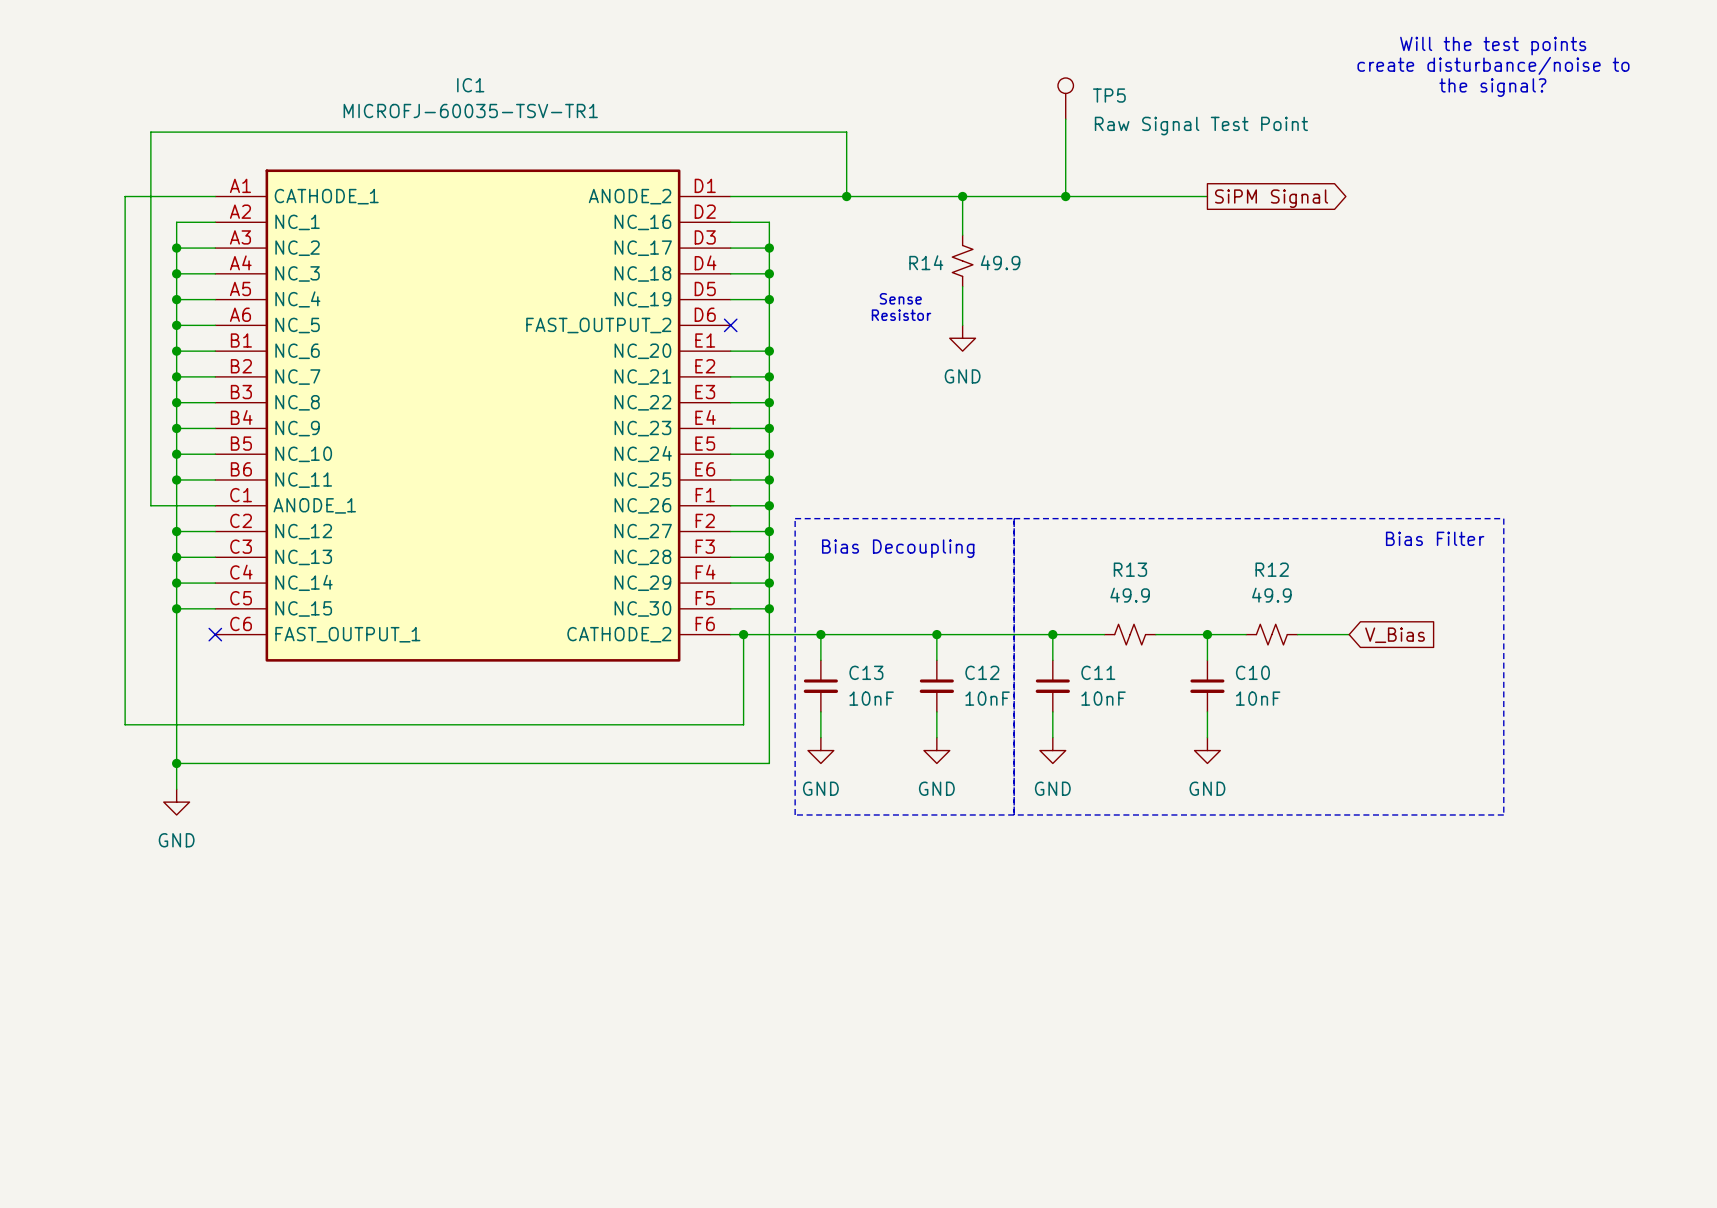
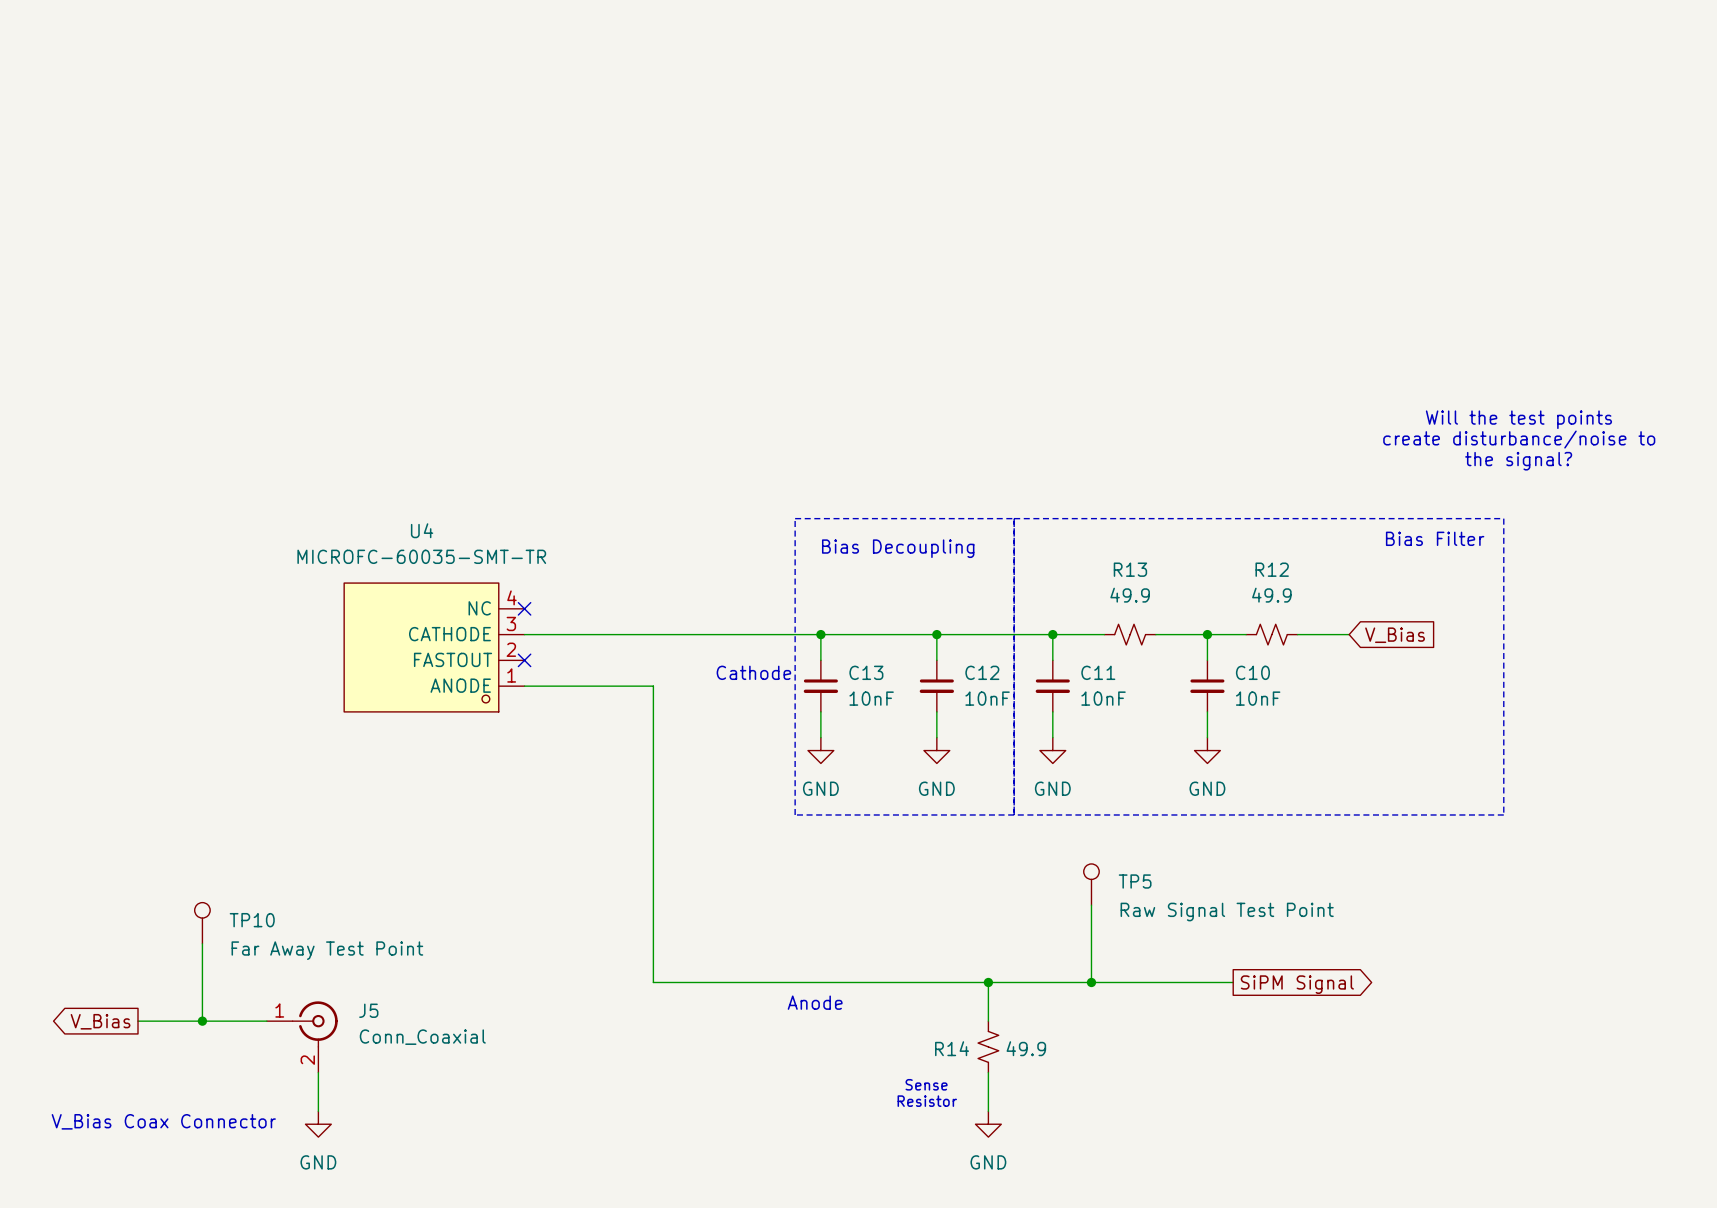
text: Will the test points (1493, 46) -> none
text: create disturbance/noise to (1493, 65) -> none
text: the signal? (1492, 87) -> none
TP5 position: (1065, 98) -> (1091, 884)
wire: (1065, 119) (1065, 196) -> none
wire: (215, 196) (125, 196) (125, 724) (743, 724) (743, 634) -> none
wire: (730, 196) (1207, 196) -> none
wire: (846, 196) (846, 132) (150, 132) (150, 505) (215, 505) -> none
junction: (846, 196) -> none
wire: (962, 196) (962, 235) -> none
junction: (962, 196) -> none
junction: (1065, 196) -> none
global label: SiPM Signal (1271, 198) -> none
wire: (215, 222) (176, 222) (176, 789) -> none
wire: (730, 222) (769, 222) (769, 763) (176, 763) -> none
wire: (176, 248) (215, 248) -> none
junction: (176, 248) -> none
wire: (730, 248) (769, 248) -> none
junction: (769, 248) -> none
R14 position: (962, 260) -> (988, 1046)
wire: (176, 273) (215, 273) -> none
junction: (176, 273) -> none
wire: (730, 273) (769, 273) -> none
junction: (769, 273) -> none
wire: (962, 286) (962, 325) -> none
text: Sense (900, 298) -> none
wire: (176, 299) (215, 299) -> none
junction: (176, 299) -> none
wire: (730, 299) (769, 299) -> none
junction: (769, 299) -> none
text: Resistor (901, 315) -> none
wire: (176, 325) (215, 325) -> none
junction: (176, 325) -> none
no-connect mark: (730, 325) -> none
power symbol: GND (962, 338) -> none
wire: (176, 351) (215, 351) -> none
junction: (176, 351) -> none
wire: (730, 351) (769, 351) -> none
junction: (769, 351) -> none
wire: (176, 376) (215, 376) -> none
junction: (176, 376) -> none
wire: (730, 376) (769, 376) -> none
junction: (769, 376) -> none
wire: (176, 402) (215, 402) -> none
junction: (176, 402) -> none
wire: (730, 402) (769, 402) -> none
junction: (769, 402) -> none
IC1: MICROFJ-60035-TSV-TR1 (473, 415) -> none
text: none -> Will the test points (1518, 419)
wire: (176, 428) (215, 428) -> none
junction: (176, 428) -> none
wire: (730, 428) (769, 428) -> none
junction: (769, 428) -> none
text: none -> create disturbance/noise to (1519, 439)
wire: (176, 454) (215, 454) -> none
junction: (176, 454) -> none
wire: (730, 454) (769, 454) -> none
junction: (769, 454) -> none
text: none -> the signal? (1518, 461)
wire: (176, 479) (215, 479) -> none
junction: (176, 479) -> none
wire: (730, 479) (769, 479) -> none
junction: (769, 479) -> none
wire: (730, 505) (769, 505) -> none
junction: (769, 505) -> none
wire: (176, 531) (215, 531) -> none
junction: (176, 531) -> none
wire: (730, 531) (769, 531) -> none
junction: (769, 531) -> none
wire: (176, 557) (215, 557) -> none
junction: (176, 557) -> none
wire: (730, 557) (769, 557) -> none
junction: (769, 557) -> none
wire: (176, 583) (215, 583) -> none
junction: (176, 583) -> none
wire: (730, 583) (769, 583) -> none
junction: (769, 583) -> none
wire: (176, 608) (215, 608) -> none
junction: (176, 608) -> none
no-connect mark: none -> (524, 608)
wire: (730, 608) (769, 608) -> none
junction: (769, 608) -> none
no-connect mark: (215, 634) -> none
junction: (743, 634) -> none
U4: none -> MICROFC-60035-SMT-TR (434, 647)
no-connect mark: none -> (524, 660)
text: none -> Cathode (753, 672)
wire: none -> (524, 686) (653, 686) (653, 982) (1233, 982)
junction: (176, 763) -> none
power symbol: GND (176, 802) -> none
wire: none -> (1091, 905) (1091, 982)
TP10: none -> Far Away Test Point (202, 923)
wire: none -> (202, 943) (202, 1021)
wire: none -> (988, 982) (988, 1021)
junction: none -> (988, 982)
junction: none -> (1091, 982)
global label: none -> SiPM Signal (1297, 984)
text: none -> Anode (815, 1002)
global label: none -> V_Bias (100, 1021)
wire: none -> (138, 1021) (266, 1021)
junction: none -> (202, 1021)
J5: none -> Conn_Coaxial (302, 1037)
wire: none -> (318, 1072) (318, 1111)
wire: none -> (988, 1072) (988, 1111)
text: none -> Sense (926, 1084)
text: none -> Resistor (927, 1101)
text: none -> V_Bias Coax Connector (163, 1121)
power symbol: none -> GND (318, 1124)
power symbol: none -> GND (988, 1124)

